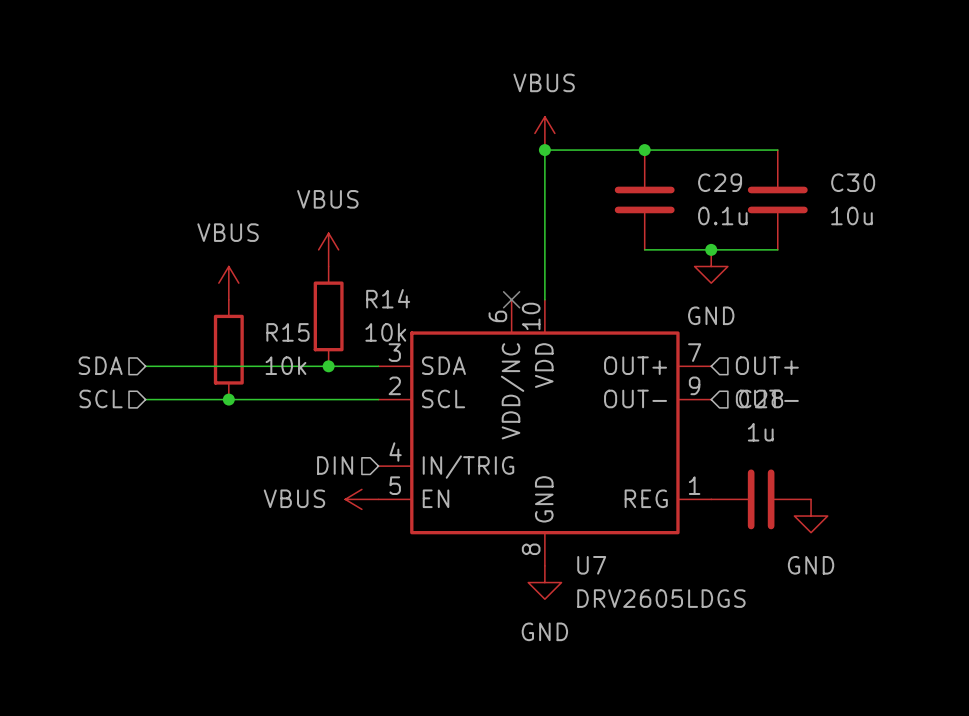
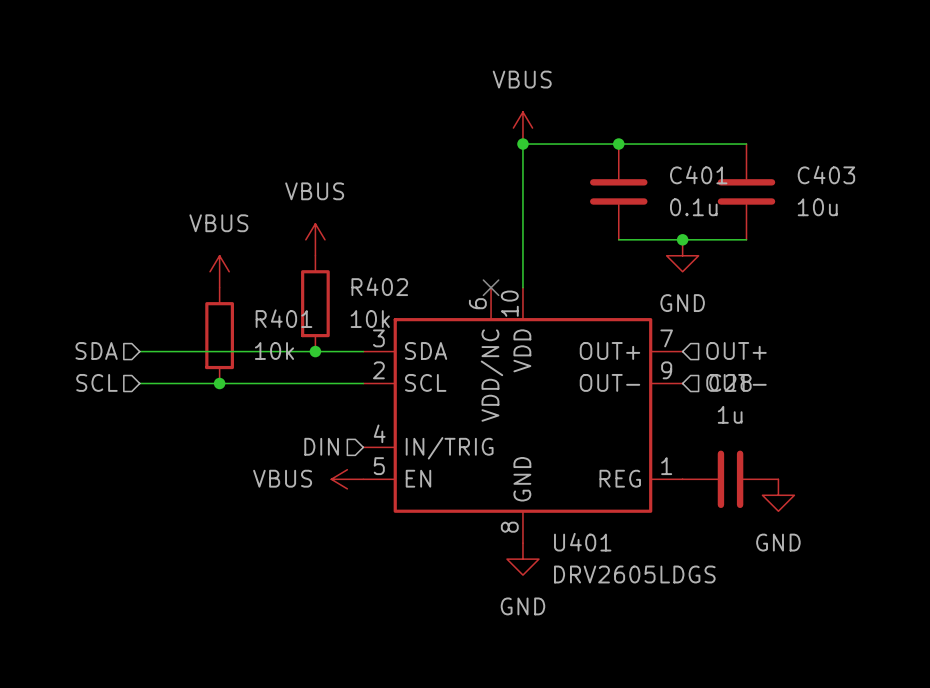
C29 name: C29 (720, 182) -> C401 (698, 174)
C30 name: C30 (853, 182) -> C403 (826, 174)
R14 name: R14 (388, 298) -> R402 (379, 286)
R15 name: R15 (287, 332) -> R401 (283, 318)
U7 name: U7 (591, 565) -> U401 (582, 542)

